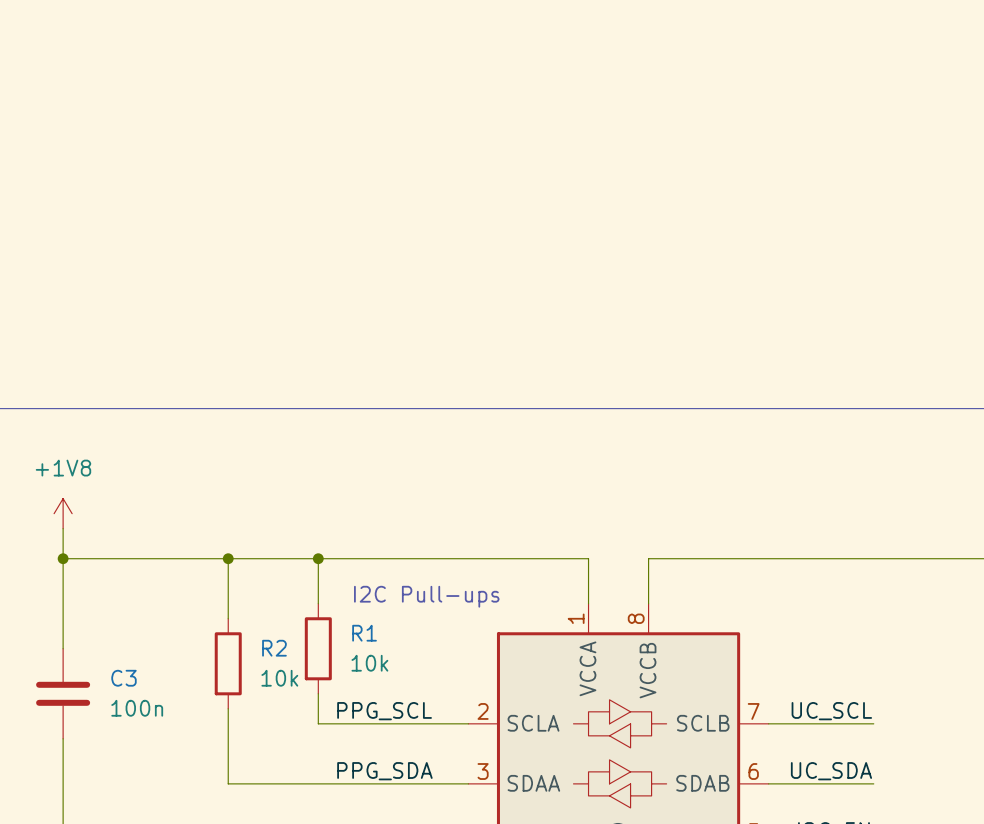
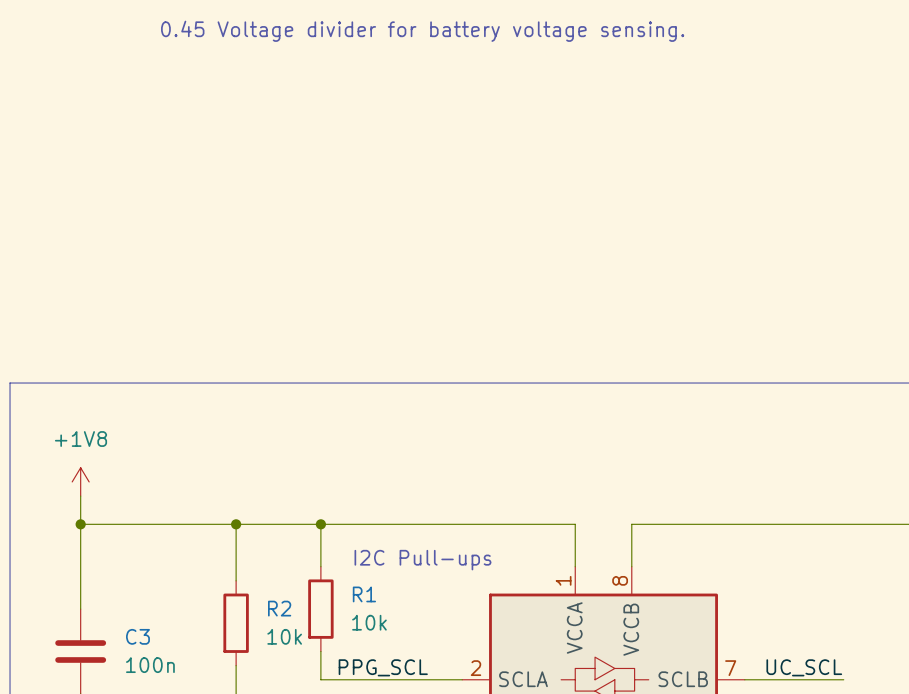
text: none -> 0.45 Voltage divider for battery voltage sensing. (422, 31)

